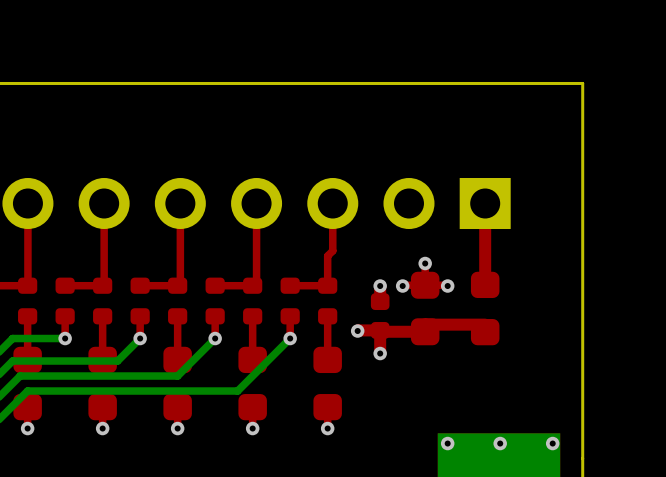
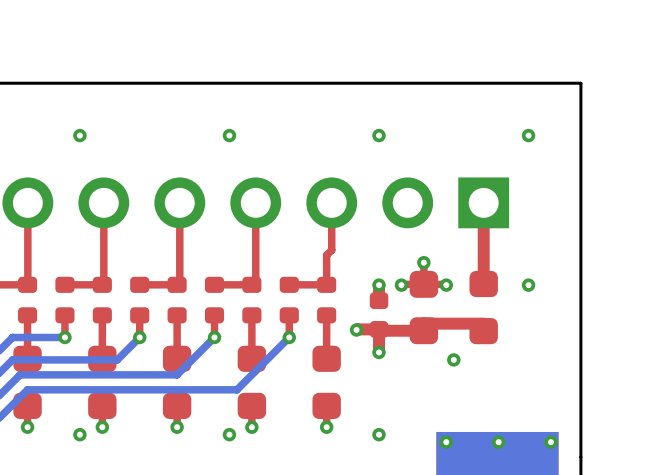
via: none -> (79, 135)
via: none -> (229, 135)
via: none -> (379, 135)
via: none -> (528, 135)
via: none -> (528, 285)
via: none -> (453, 359)
via: none -> (79, 434)
via: none -> (229, 434)
via: none -> (379, 434)

